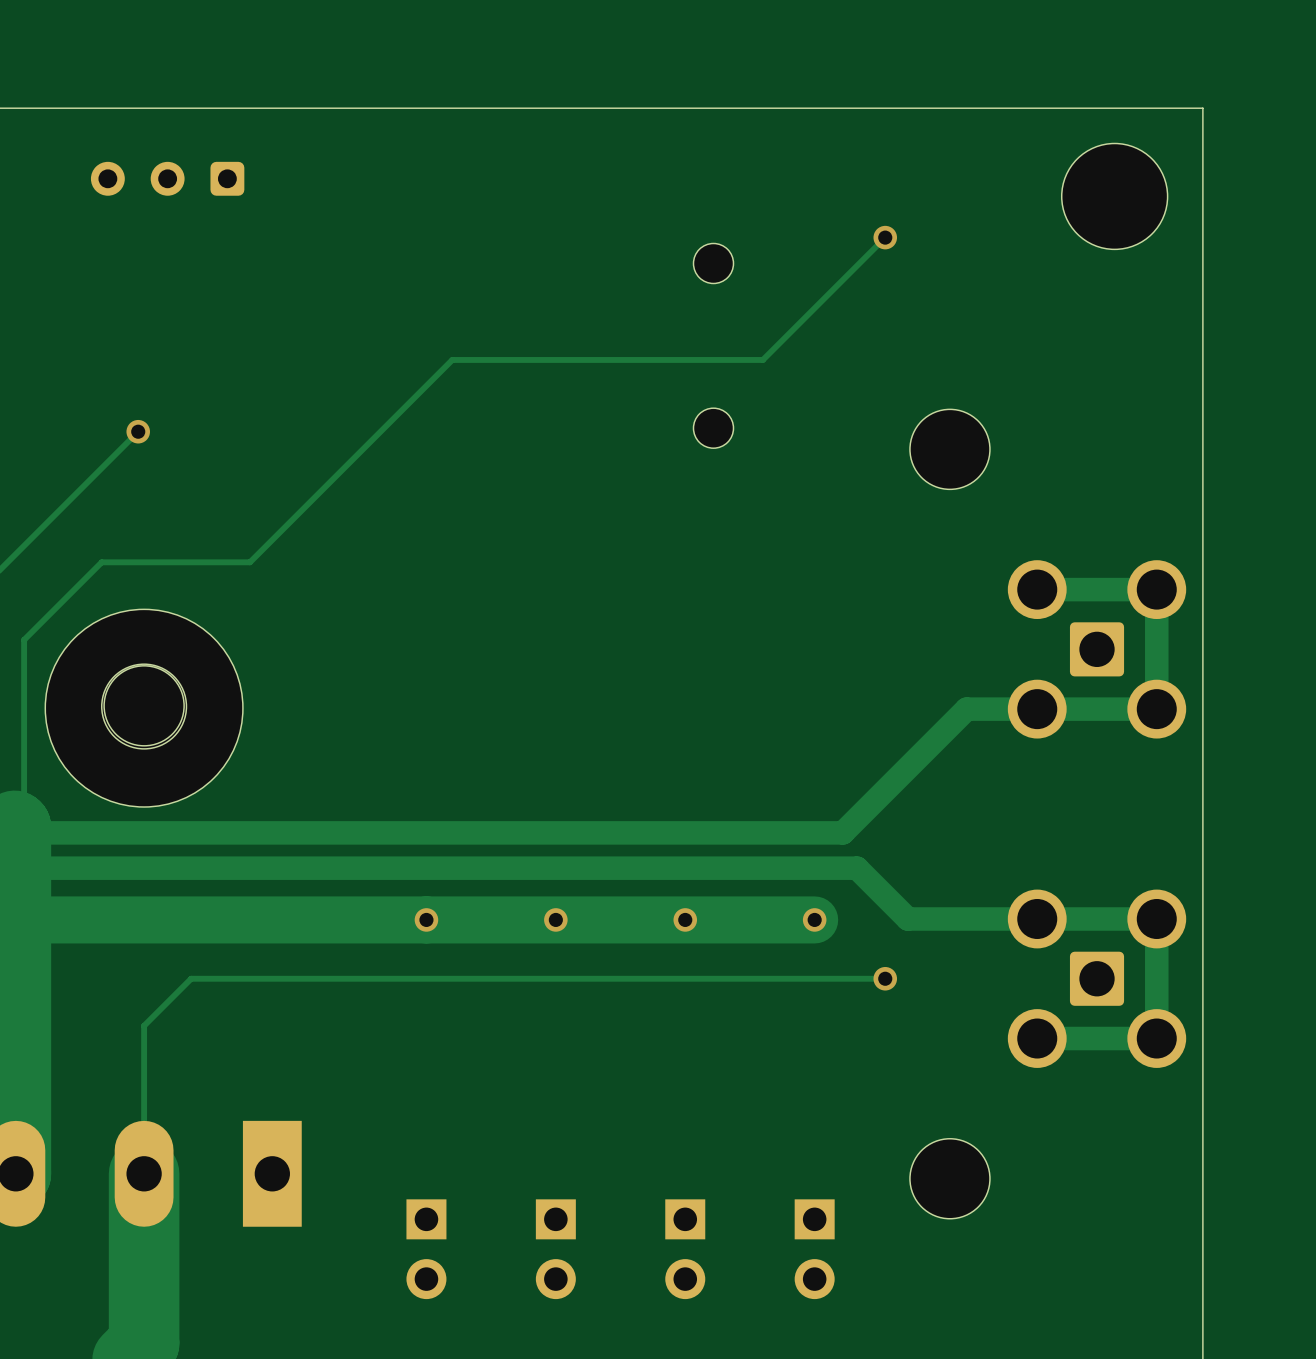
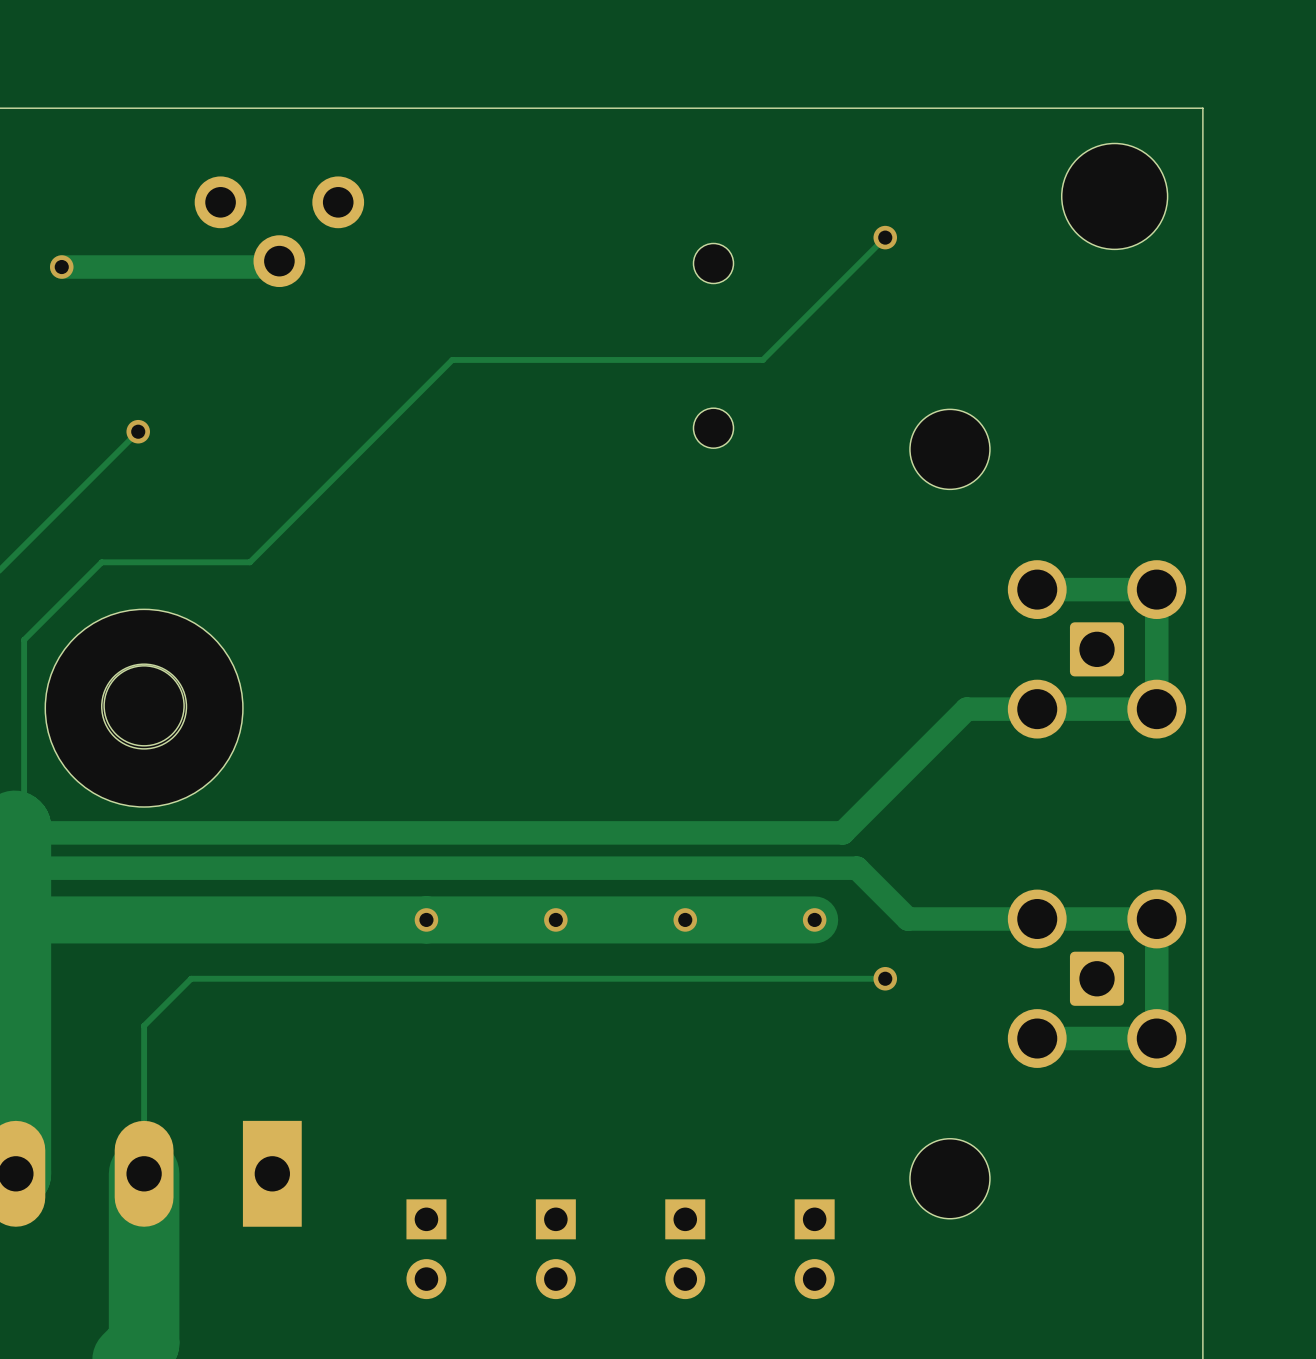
part: (167, 178) -> none
part: none -> (279, 231)
track: none -> (279, 261) (273, 267) (61, 267)
via: none -> (61, 267)

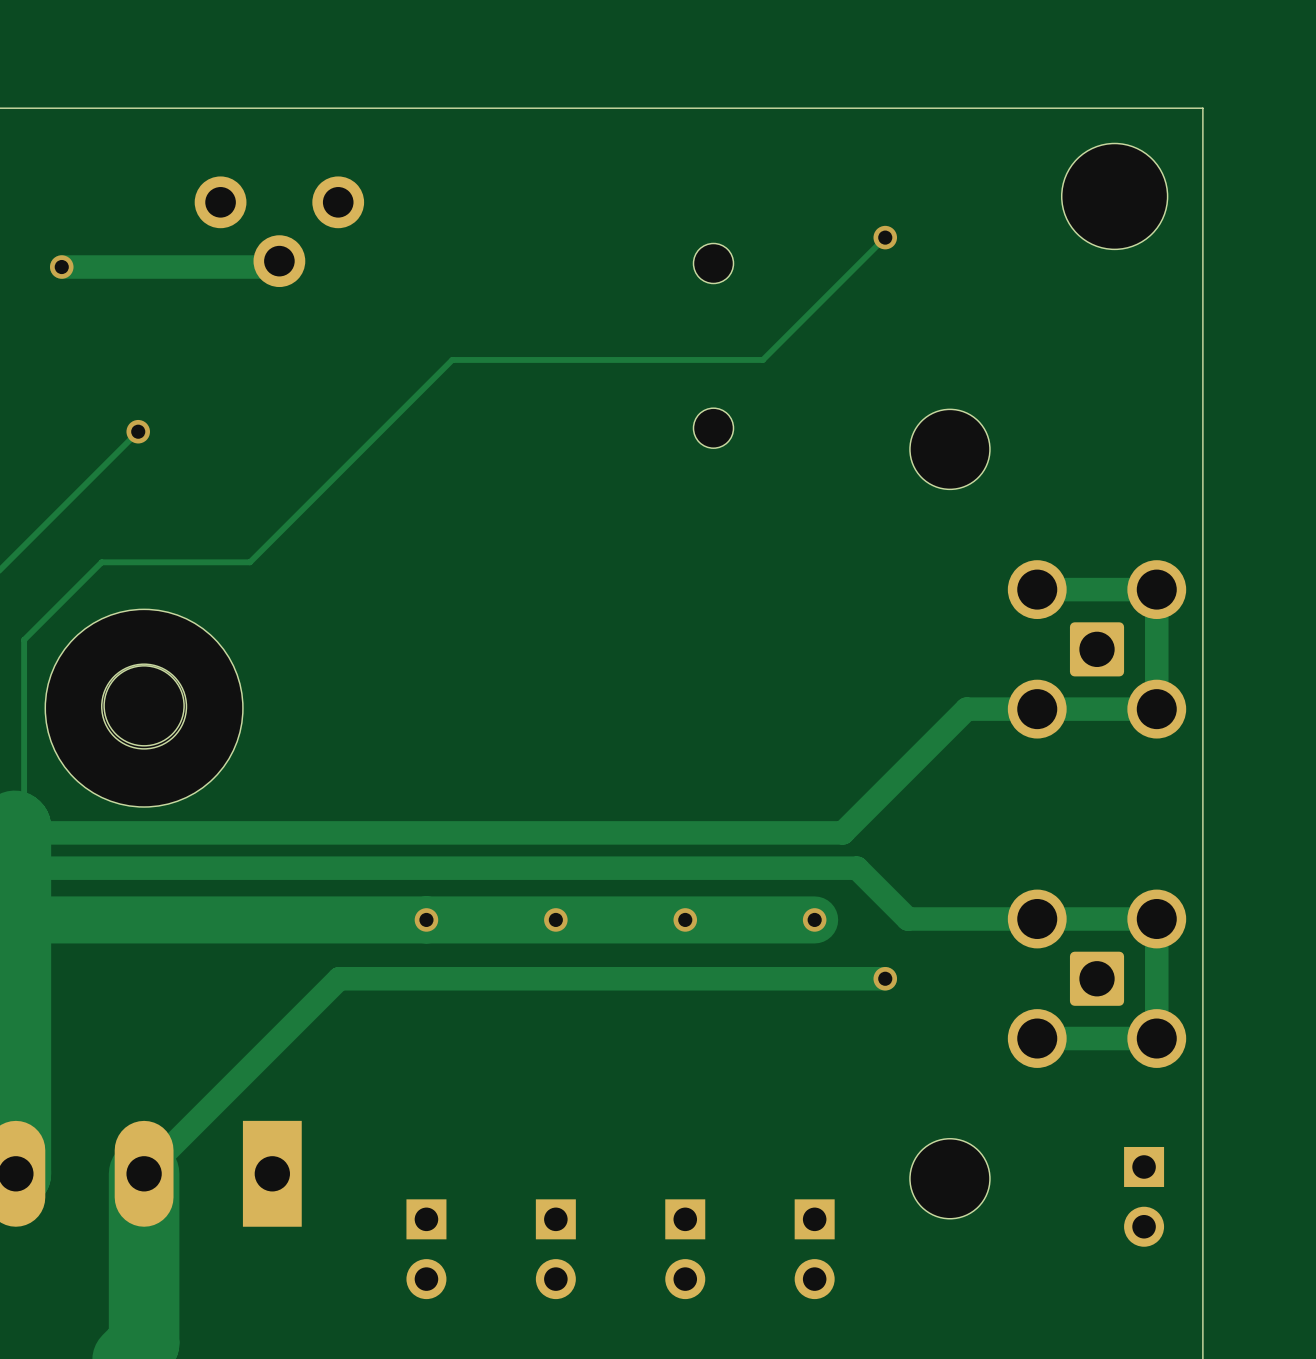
track: (339, 978) (191, 978) (144, 1025) (144, 1173) -> (339, 978) (144, 1173)
track width: thin (885, 978) (339, 978) -> thick (885, 978) (339, 978)
part: none -> (1144, 1196)

